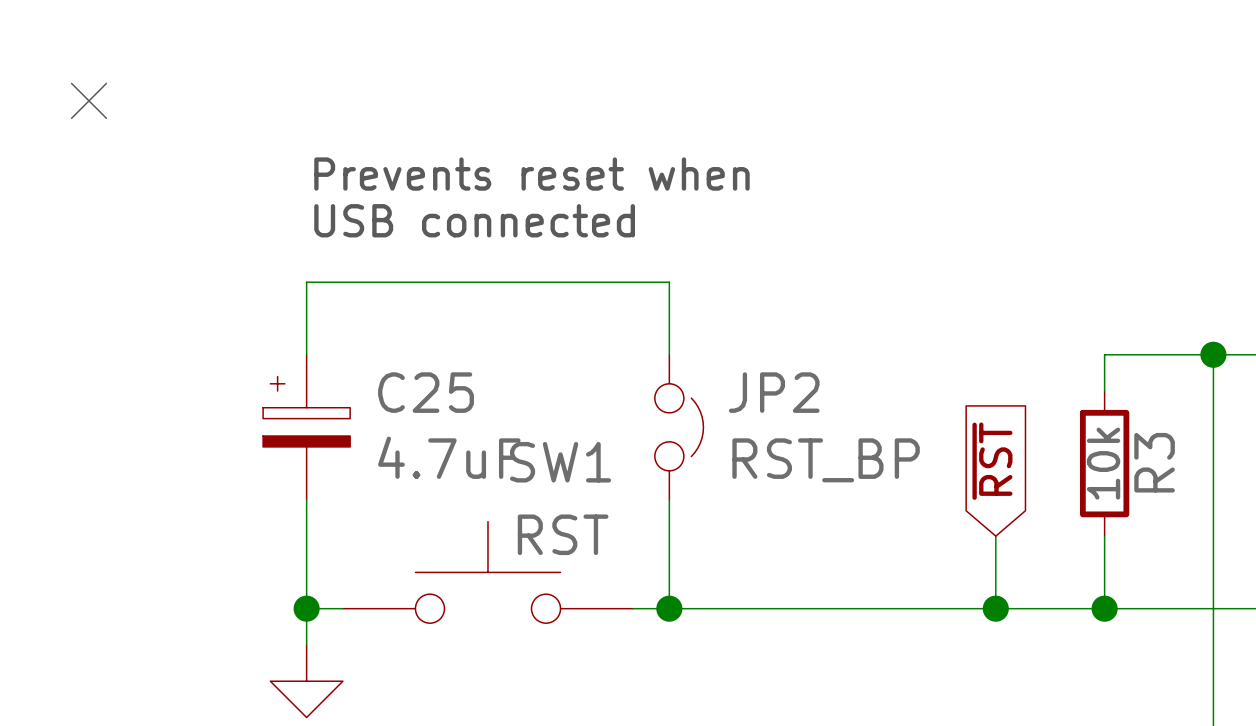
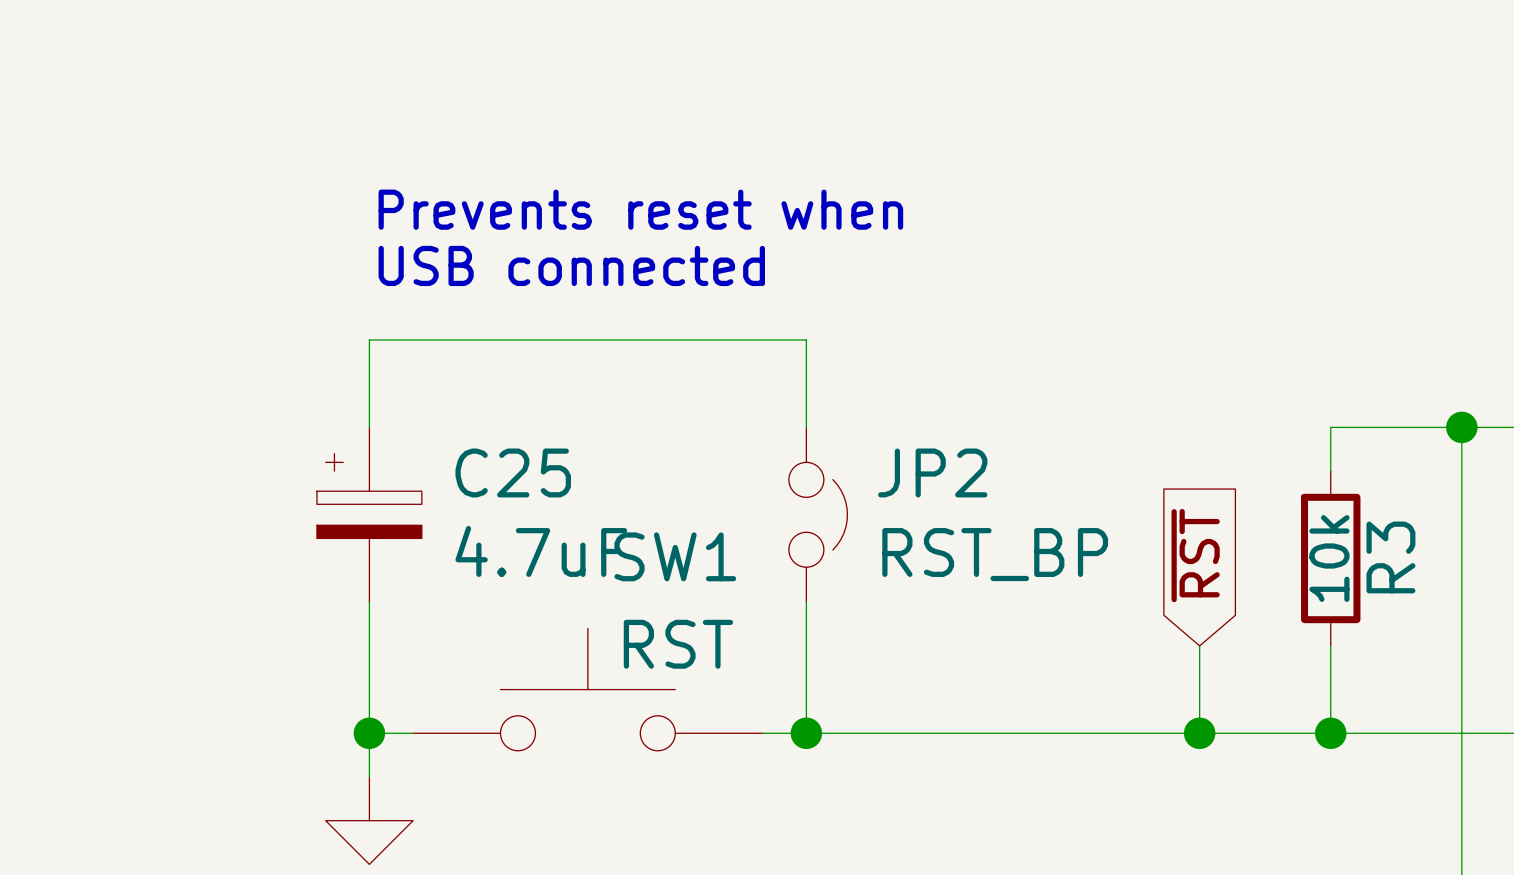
no-connect mark: (89, 100) -> none

